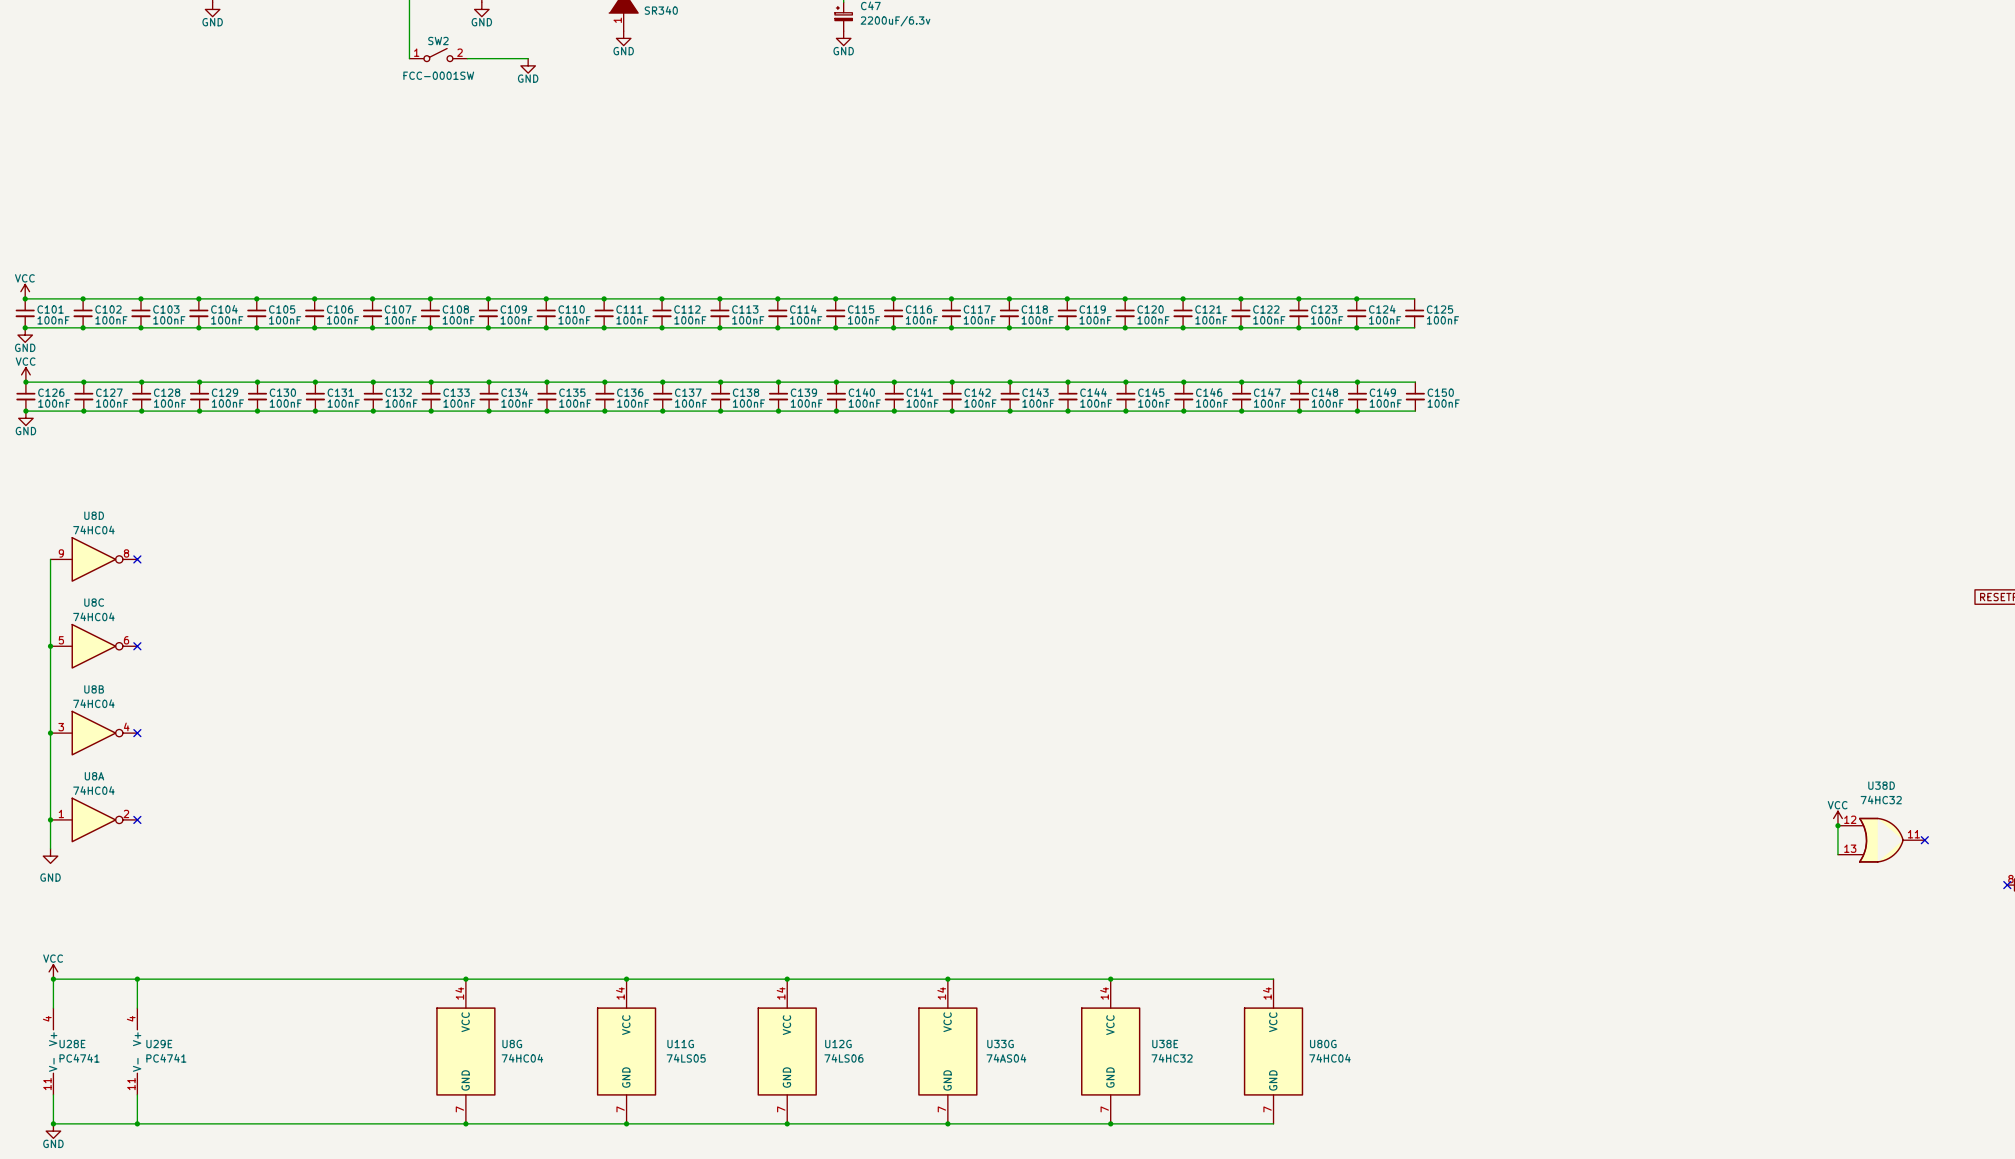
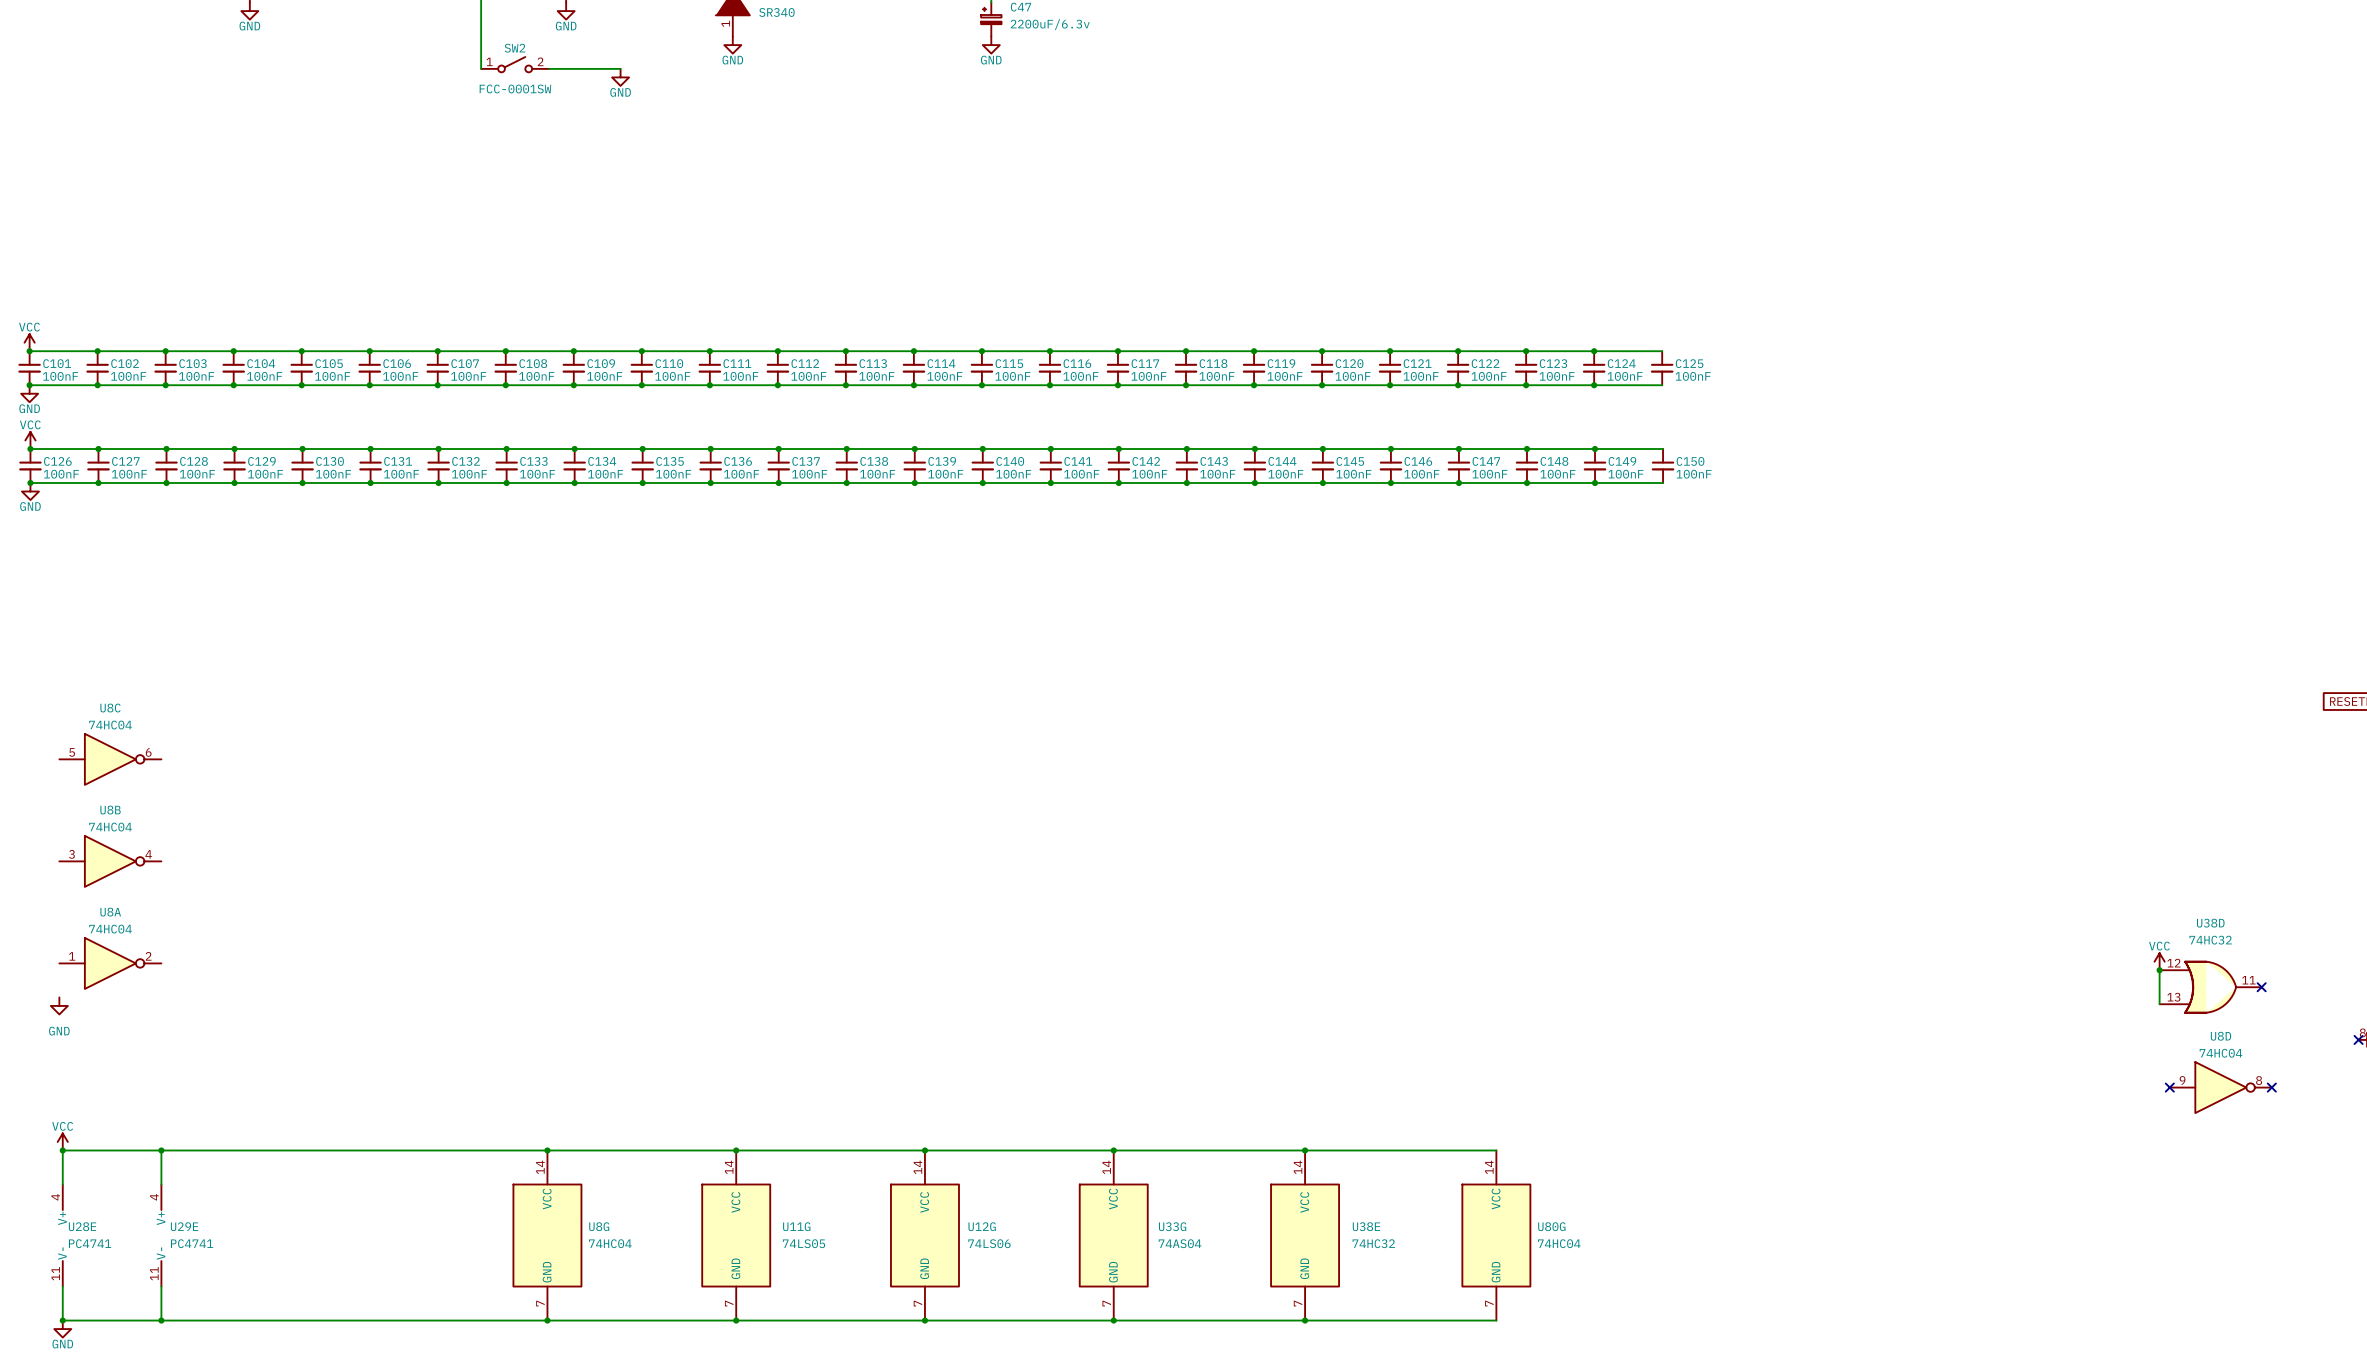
wire: (50, 559) (50, 848) -> none
U8D position: (93, 559) -> (2220, 1087)
no-connect mark: (137, 559) -> none
junction: (50, 646) -> none
no-connect mark: (137, 646) -> none
junction: (50, 733) -> none
no-connect mark: (137, 733) -> none
junction: (50, 819) -> none
no-connect mark: (137, 819) -> none
no-connect mark: none -> (2169, 1087)
no-connect mark: none -> (2271, 1087)

